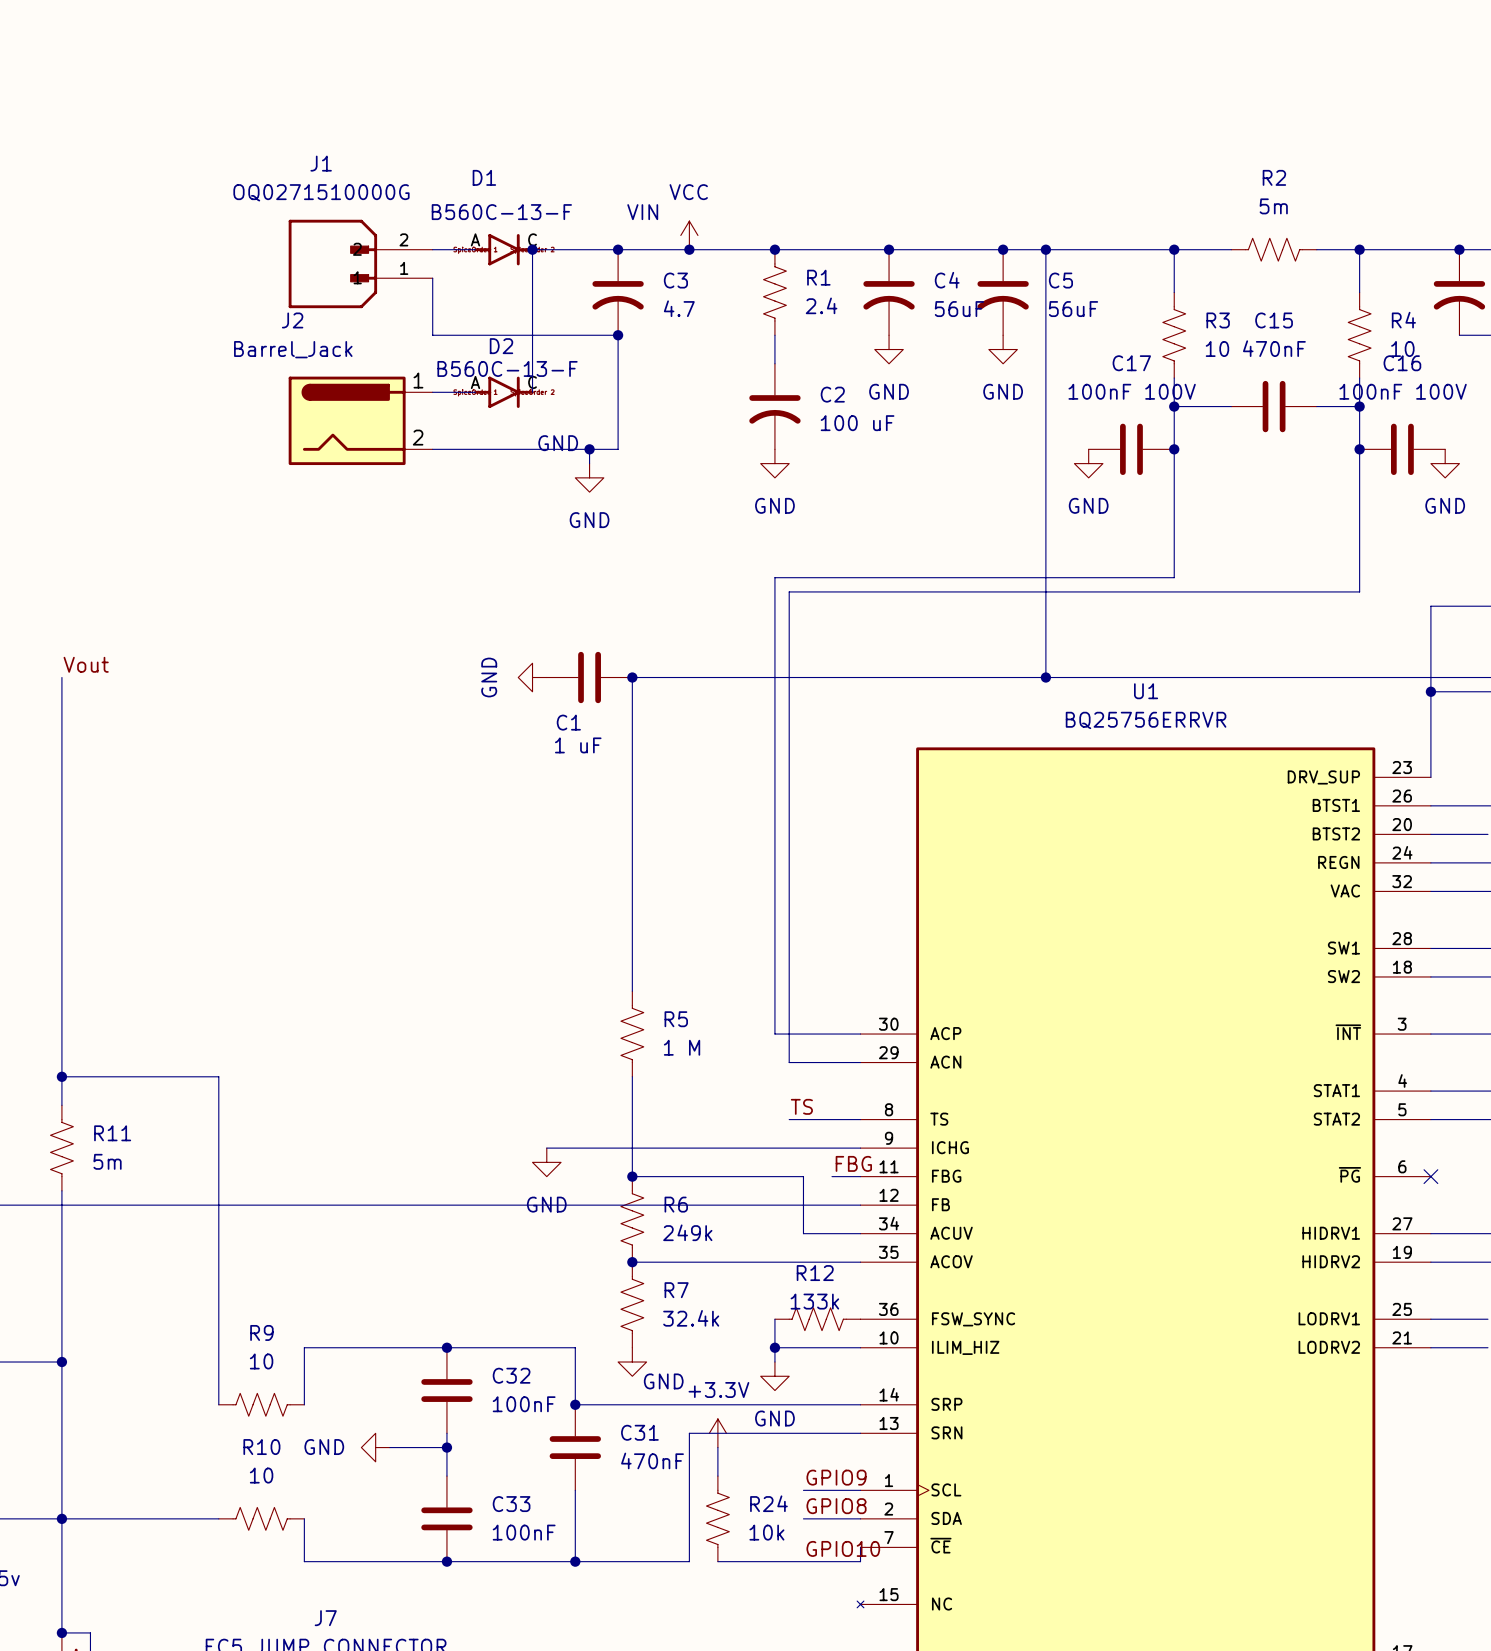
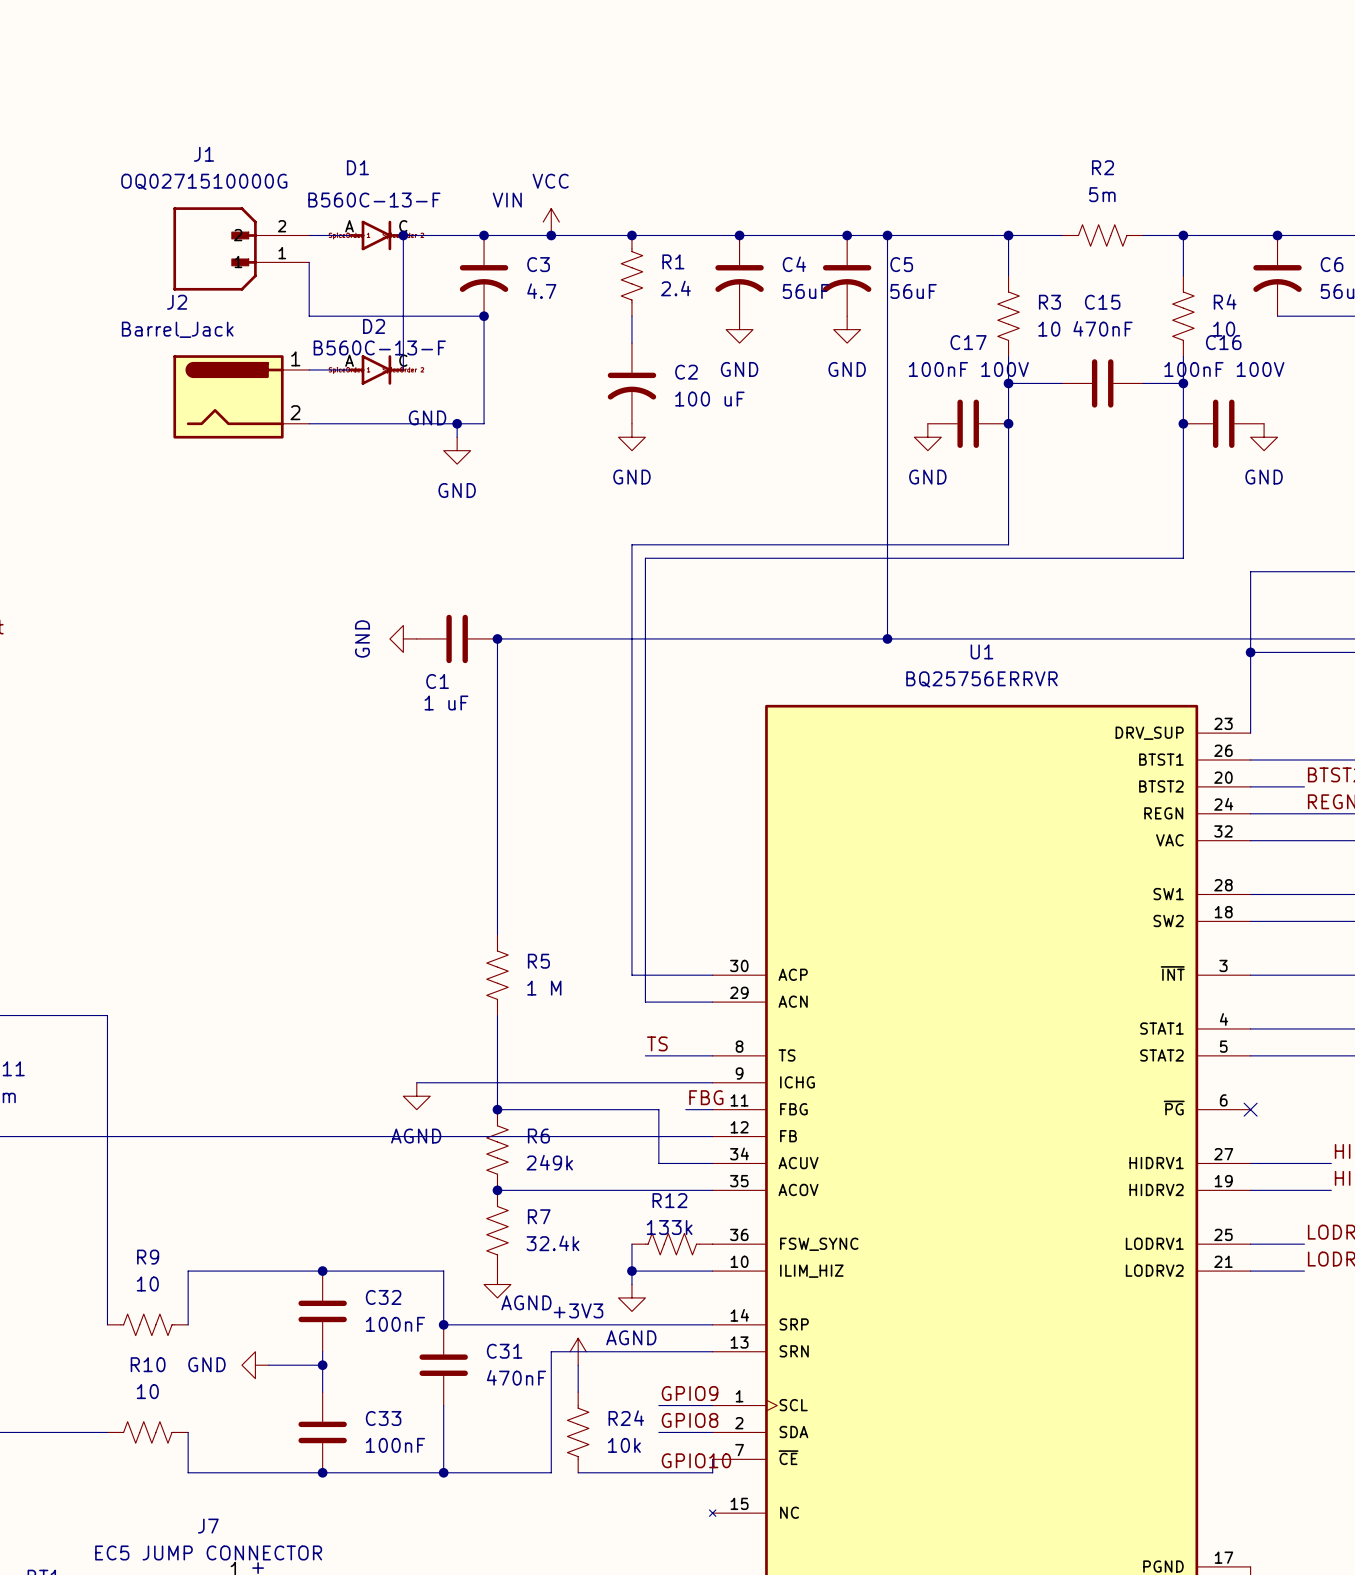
power symbol: GND (546, 1162) -> AGND (416, 1096)
power symbol: GND (632, 1362) -> AGND (497, 1284)
power symbol: GND (774, 1376) -> AGND (631, 1297)
power symbol: +3.3V (717, 1433) -> +3V3 (578, 1351)

